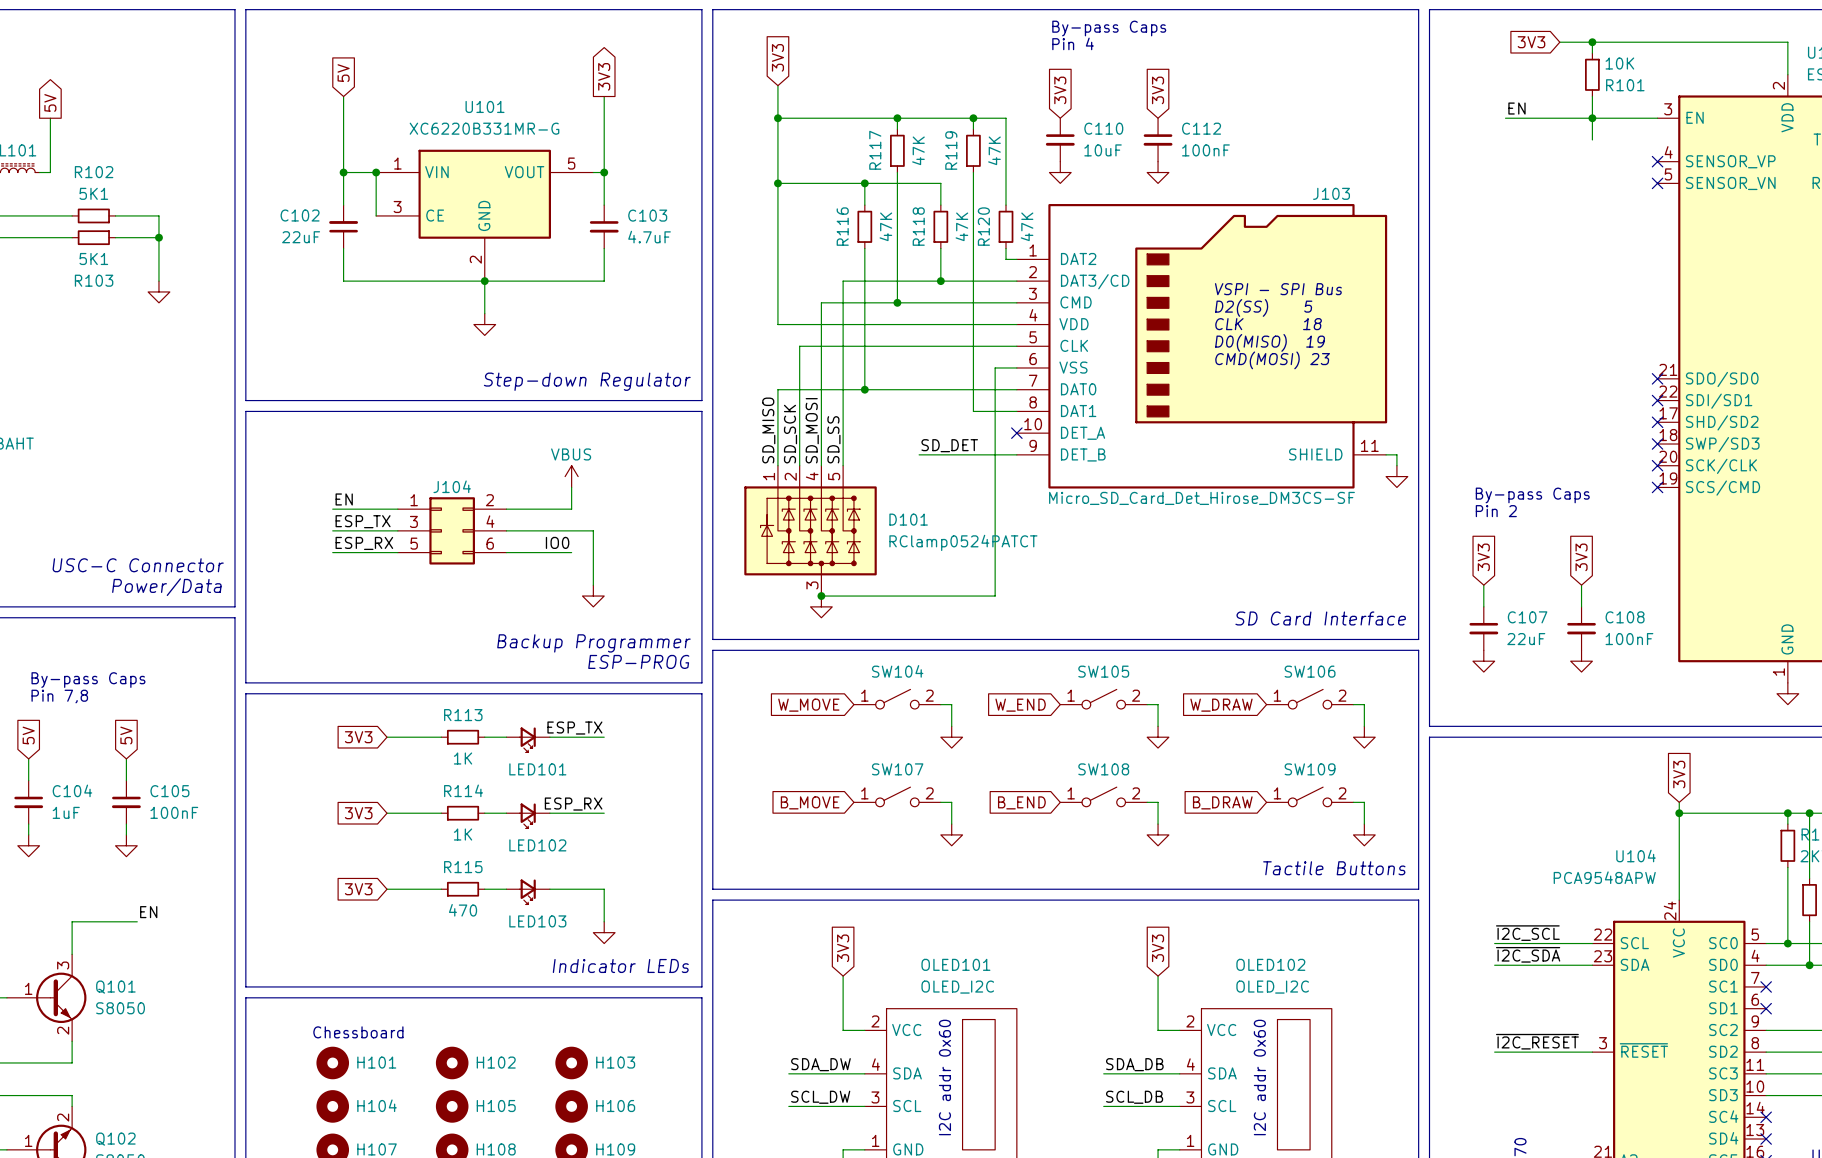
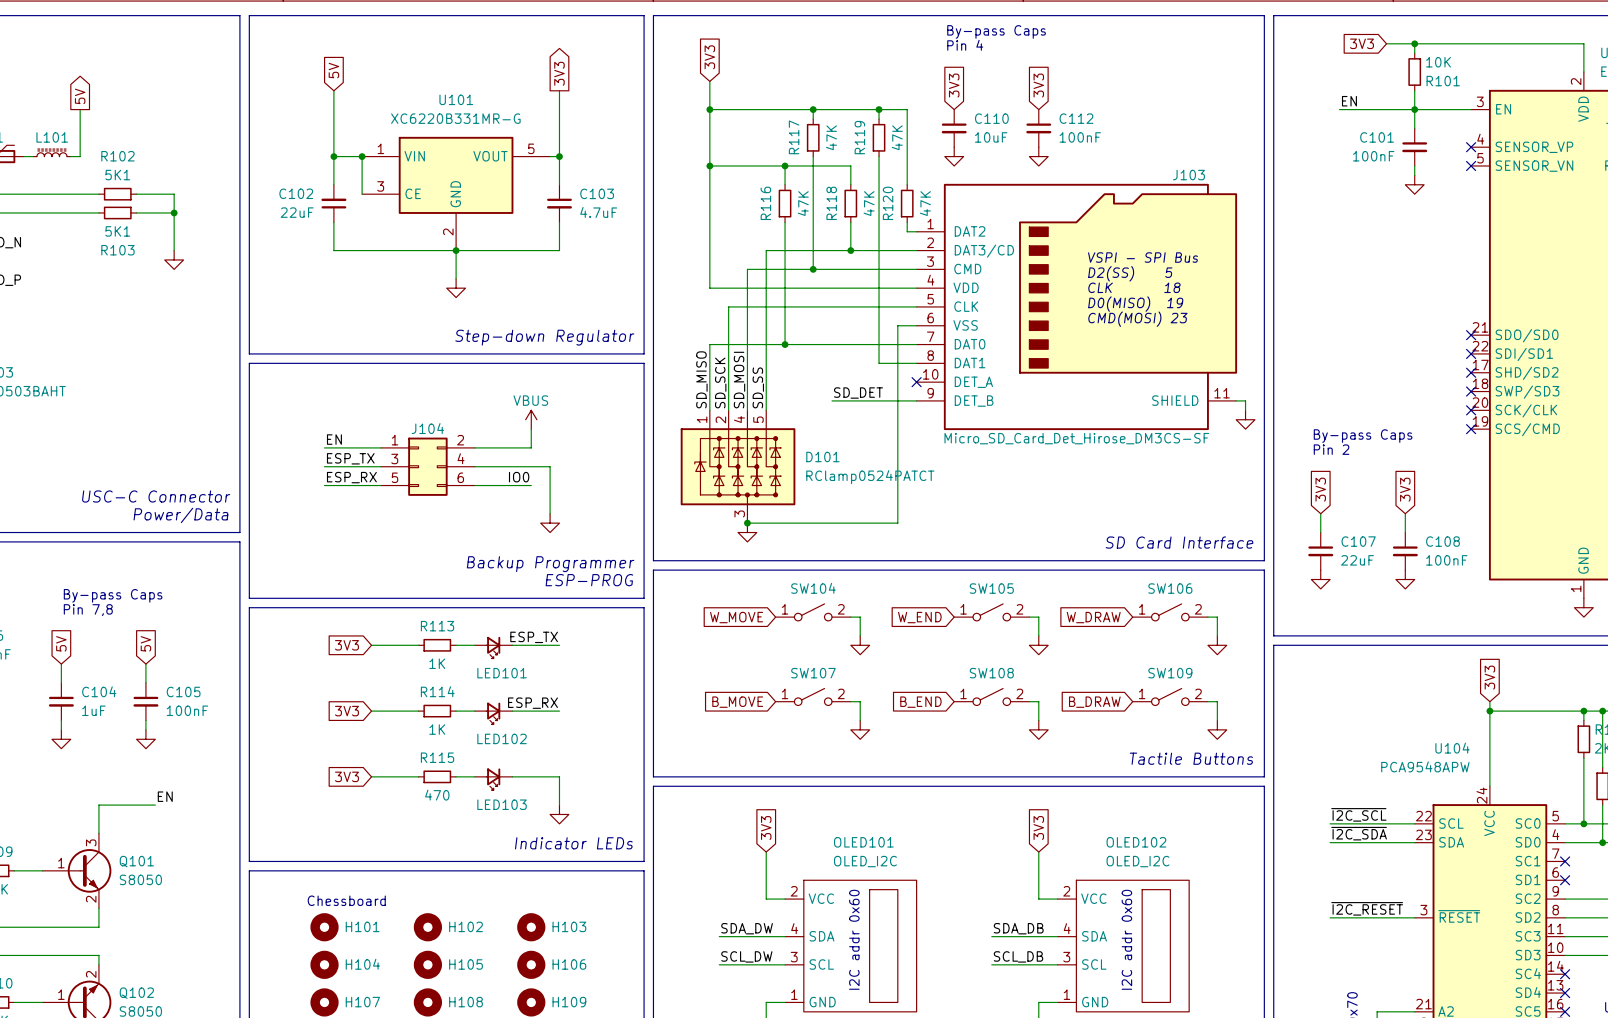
C101: none -> 100nF (1414, 147)
wire: none -> (1414, 165) (1414, 175)
power symbol: none -> (1414, 184)

